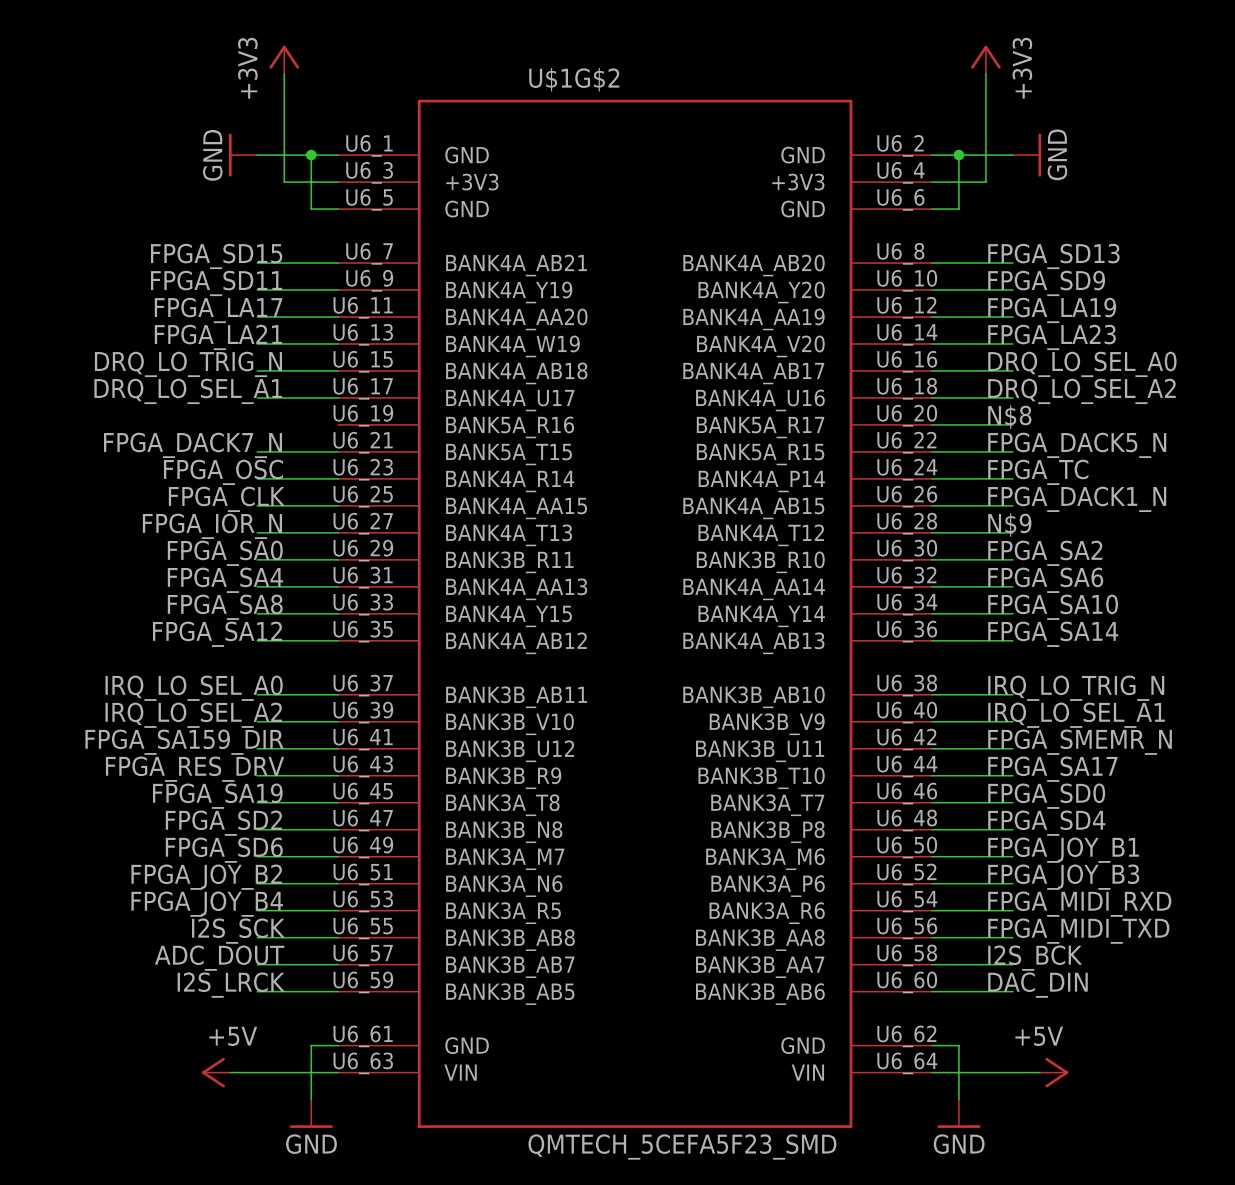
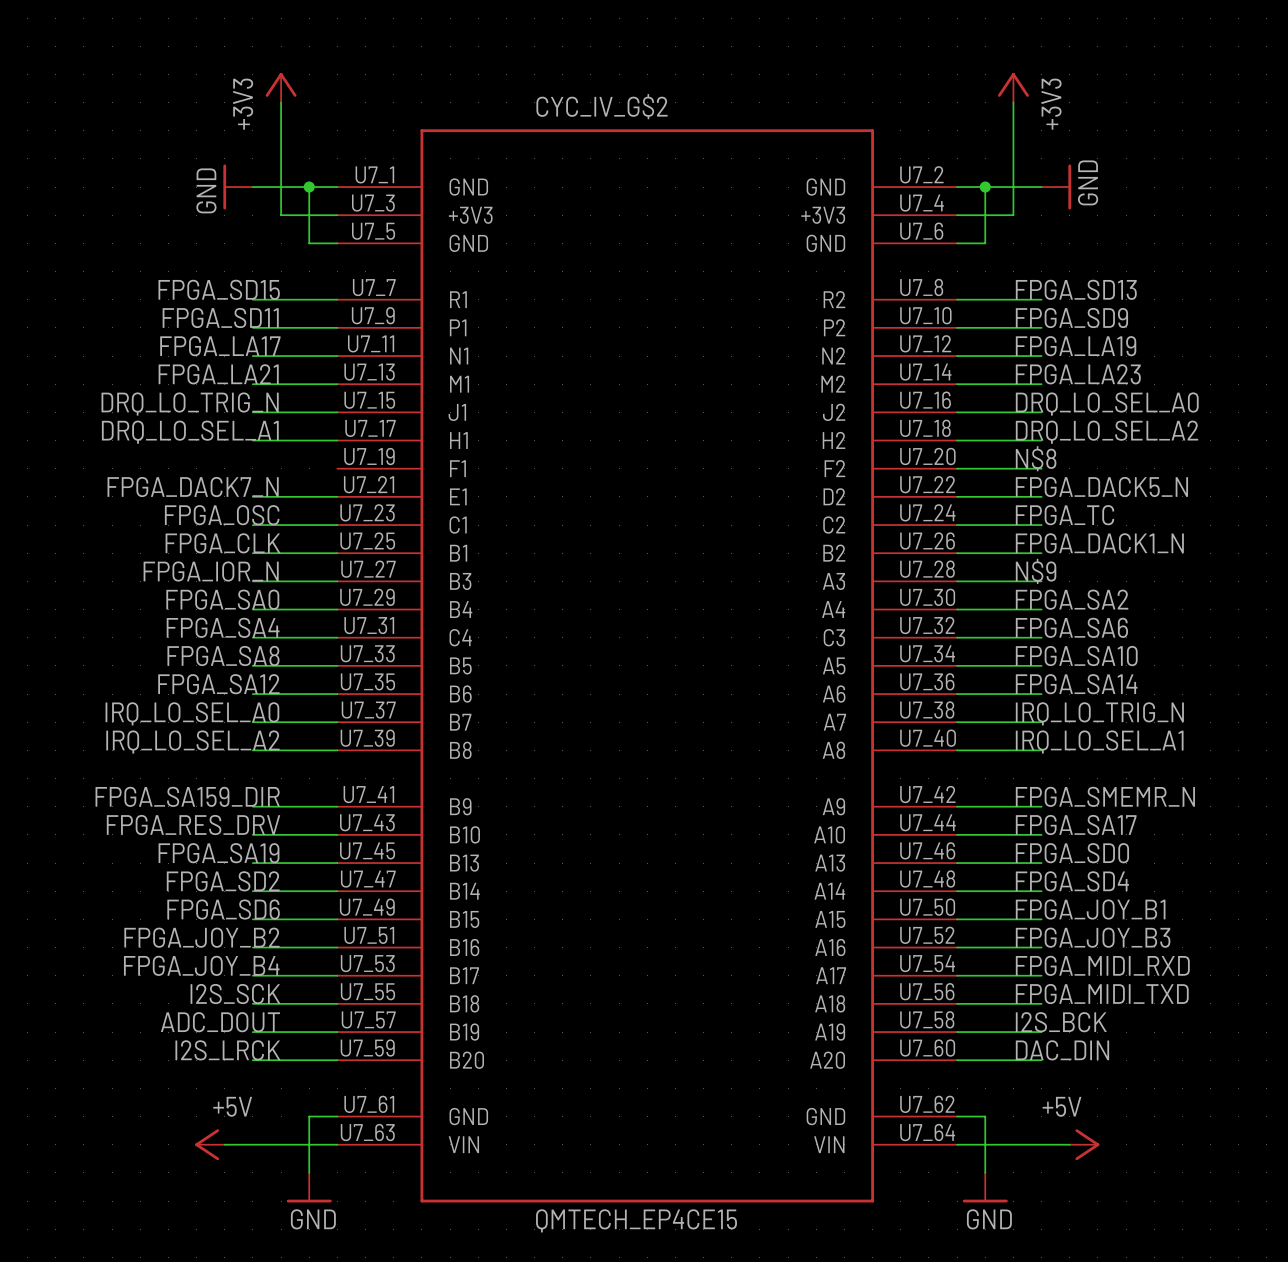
U$1G$2: QMTECH_5CEFA5F23_SMD (635, 613) -> none
CYC_IV_G$2: none -> QMTECH_EP4CE15 (647, 665)
label: none -> IRQ_LO_SEL_A0 (192, 713)
label: none -> IRQ_LO_TRIG_N (1099, 713)
label: IRQ_LO_SEL_A0 (194, 688) -> IRQ_LO_SEL_A2 (192, 742)
label: IRQ_LO_TRIG_N (1076, 688) -> IRQ_LO_SEL_A1 (1099, 742)
label: IRQ_LO_SEL_A2 (193, 715) -> none
label: IRQ_LO_SEL_A1 (1076, 715) -> none
wire: (257, 721) (338, 721) -> (252, 722) (337, 722)
wire: (931, 721) (1012, 721) -> (957, 722) (1041, 722)

